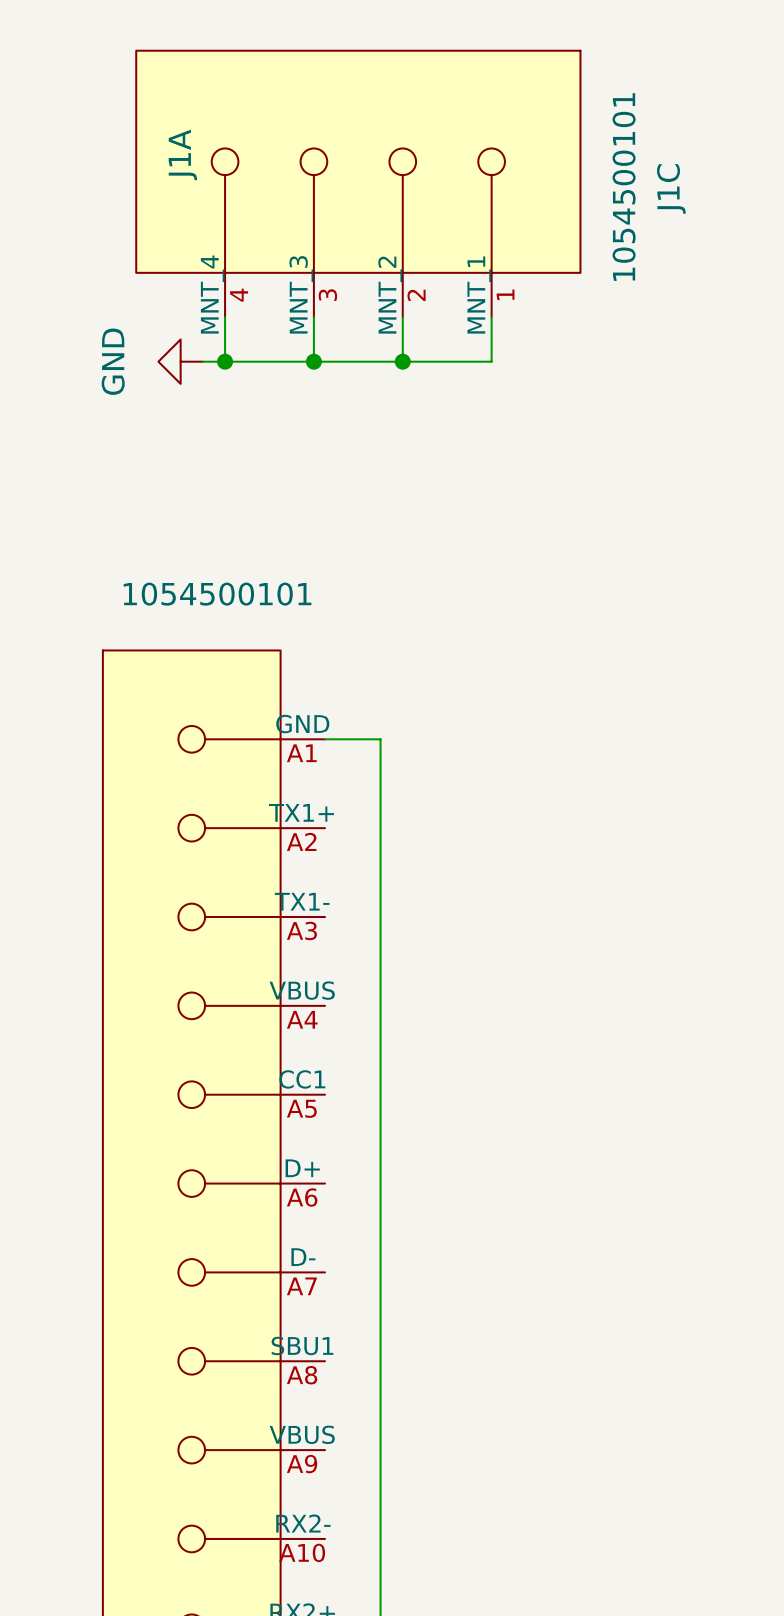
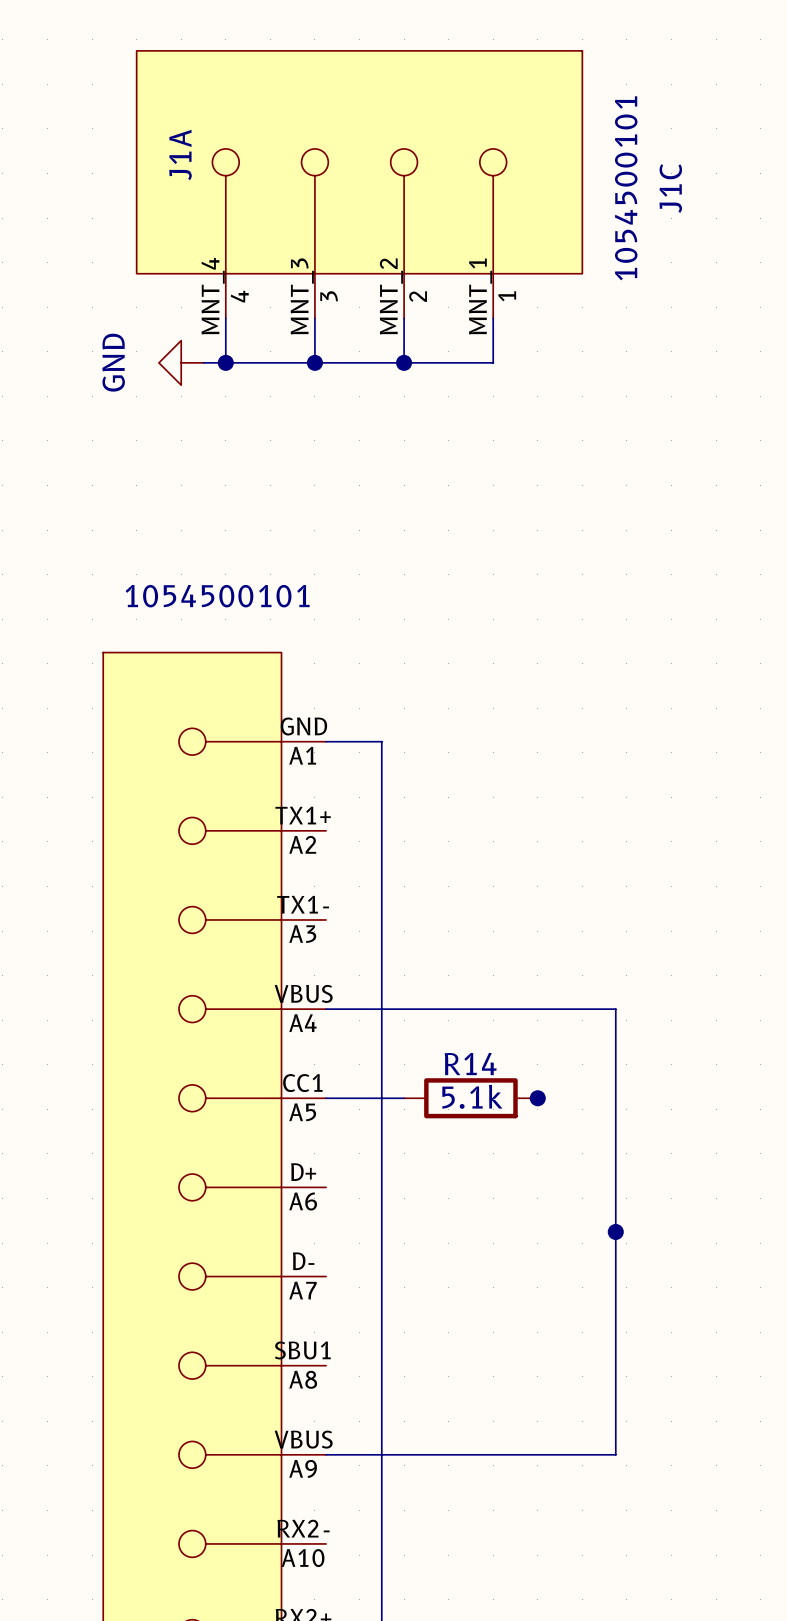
wire: none -> (326, 1009) (615, 1009) (615, 1454) (326, 1454)
wire: none -> (326, 1098) (404, 1098)
R14: none -> 5.1k (470, 1098)
junction: none -> (537, 1098)
junction: none -> (615, 1231)

